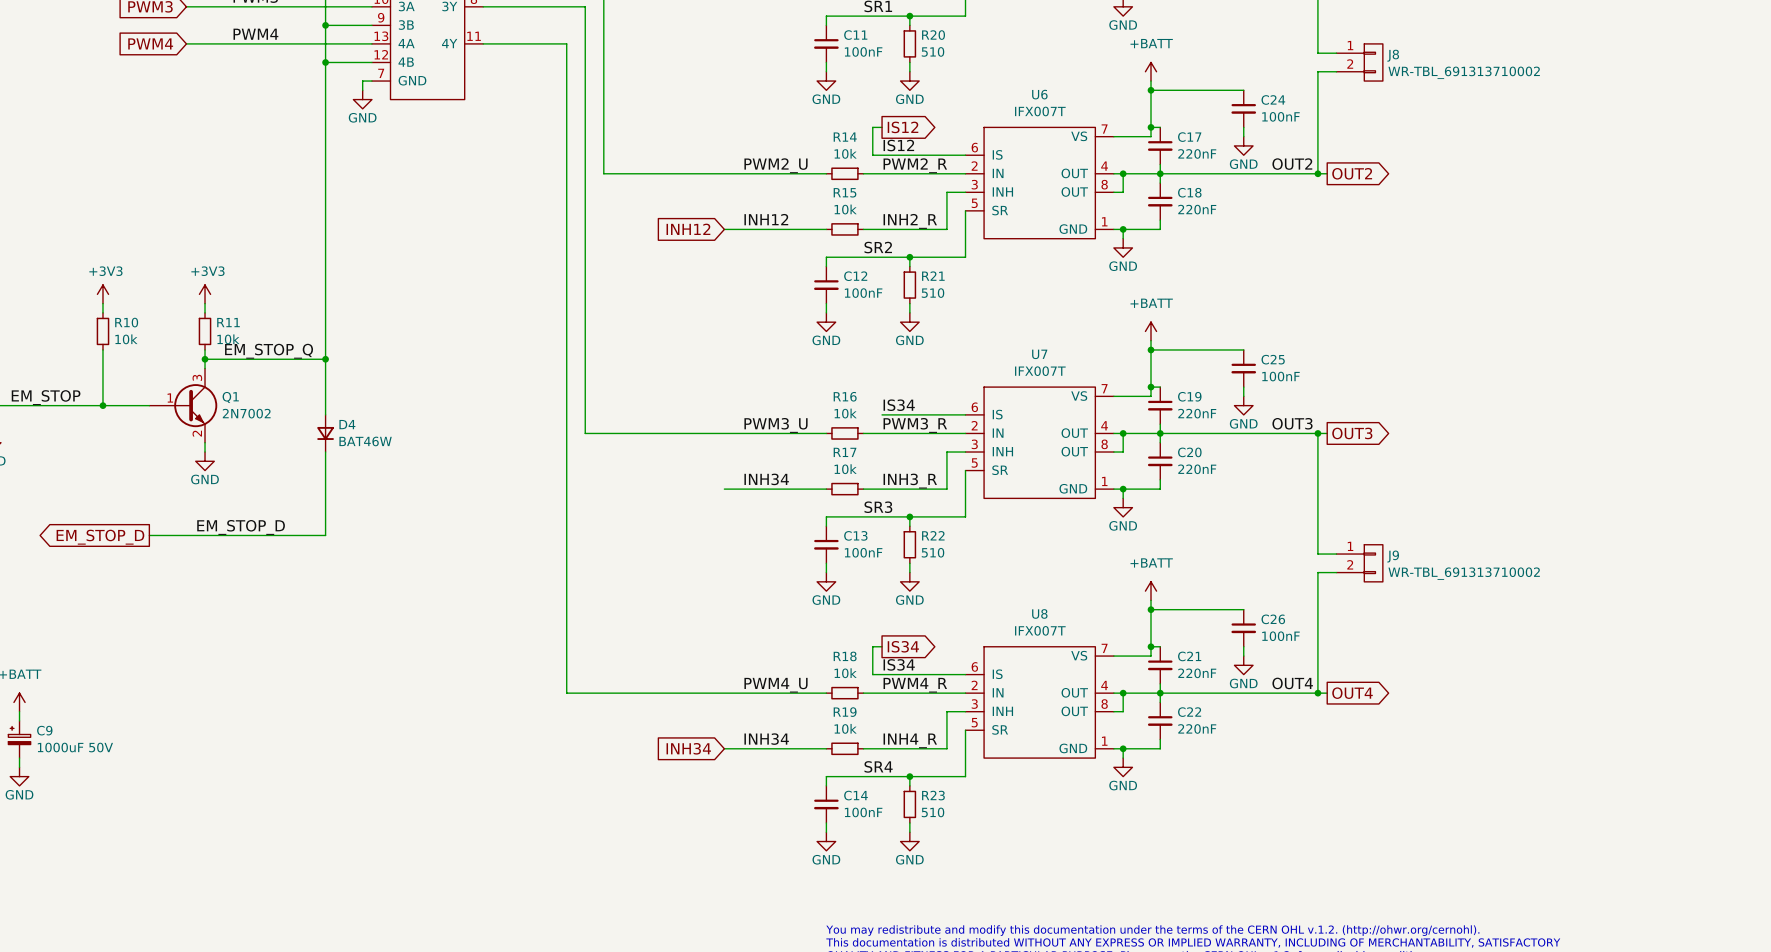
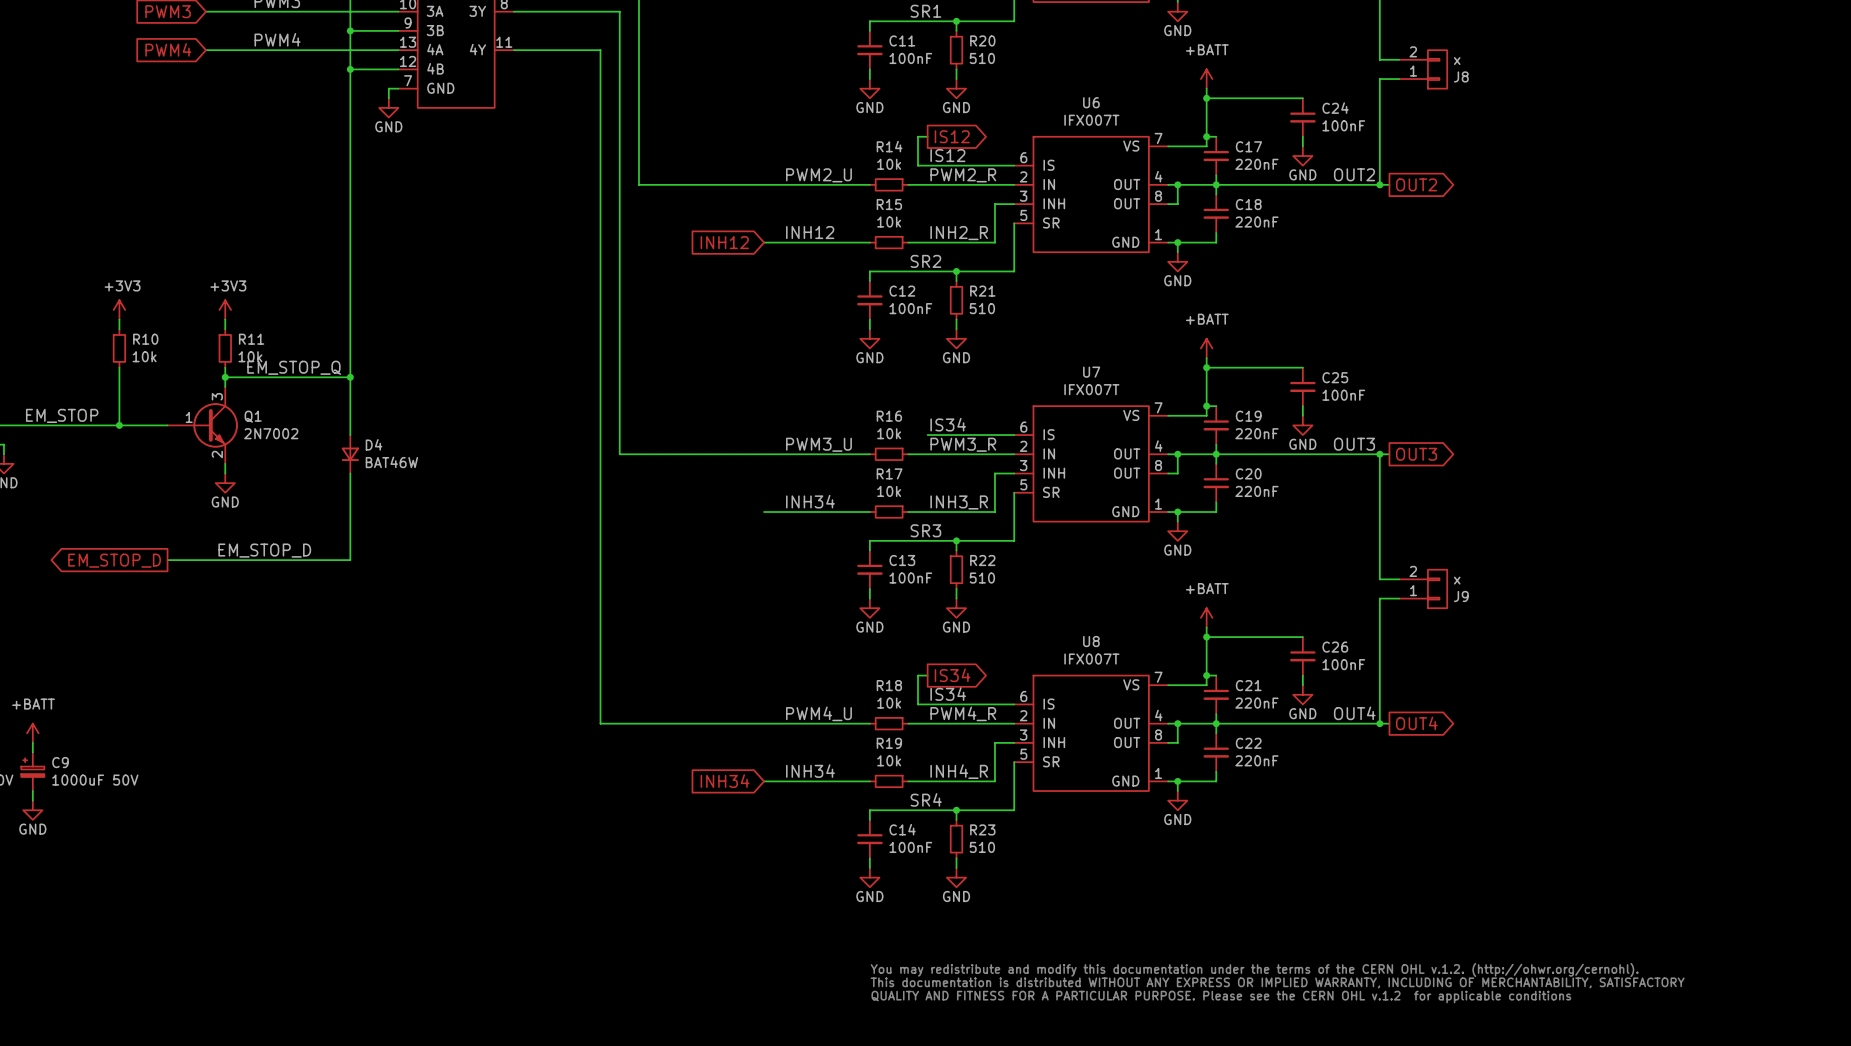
J8 flip: as is (1373, 62) -> up-down (1437, 69)
J8 value: WR-TBL_691313710002 (1464, 72) -> x (1457, 61)
J9 flip: as is (1373, 563) -> up-down (1437, 588)
J9 value: WR-TBL_691313710002 (1464, 573) -> x (1457, 580)

